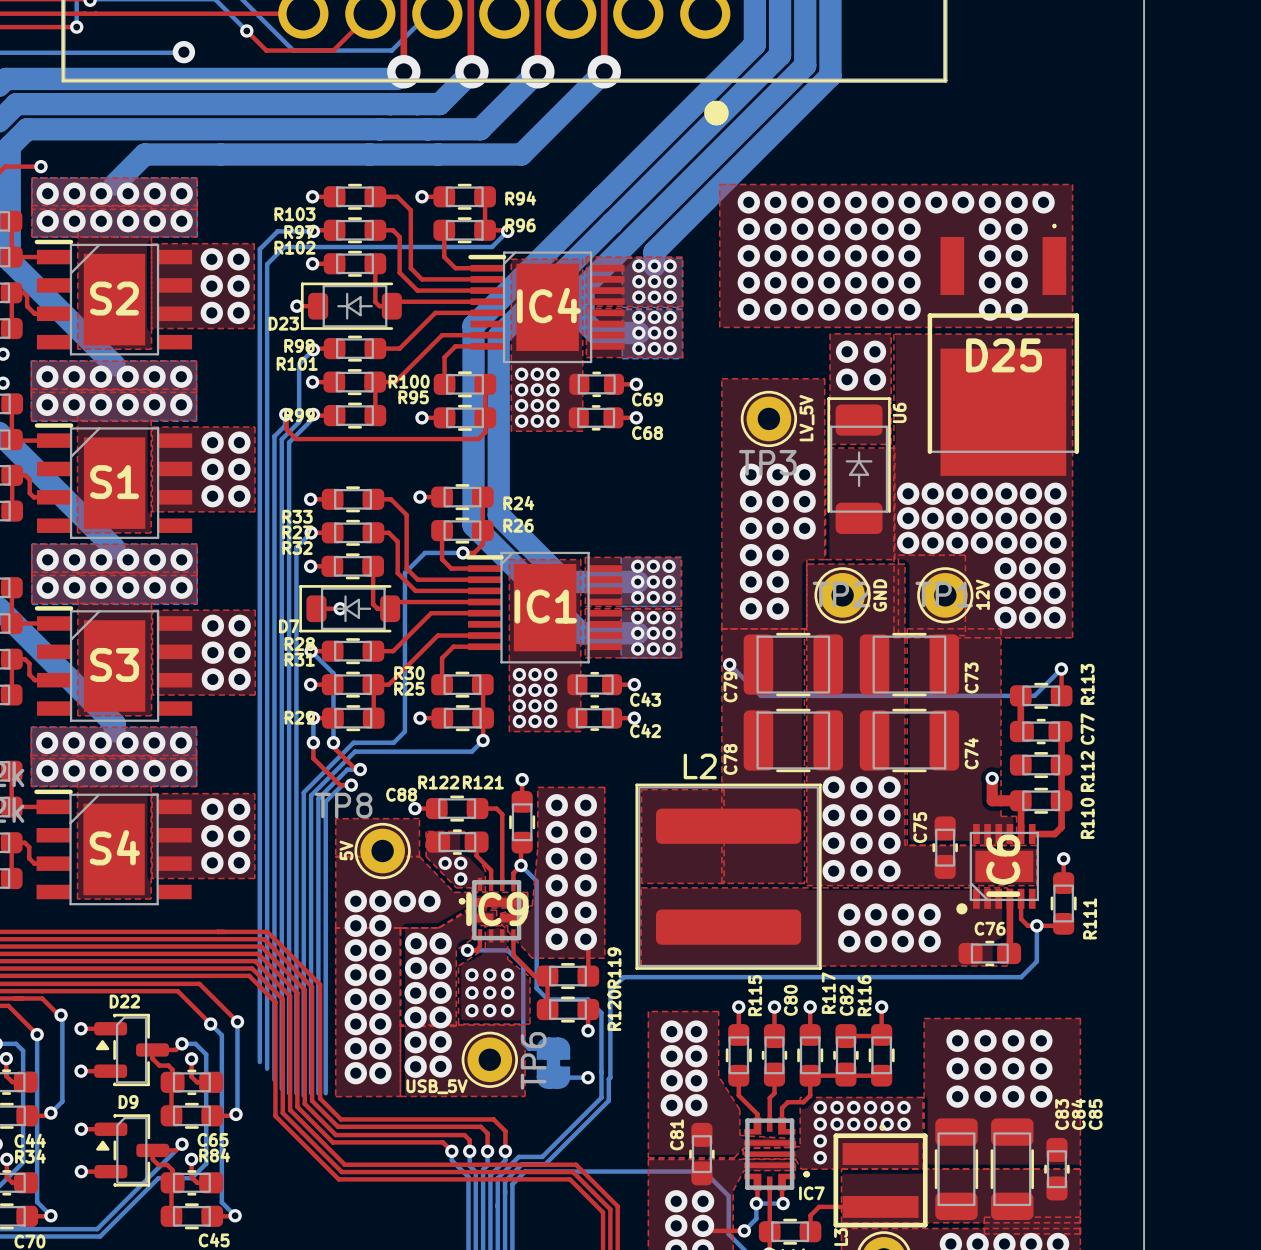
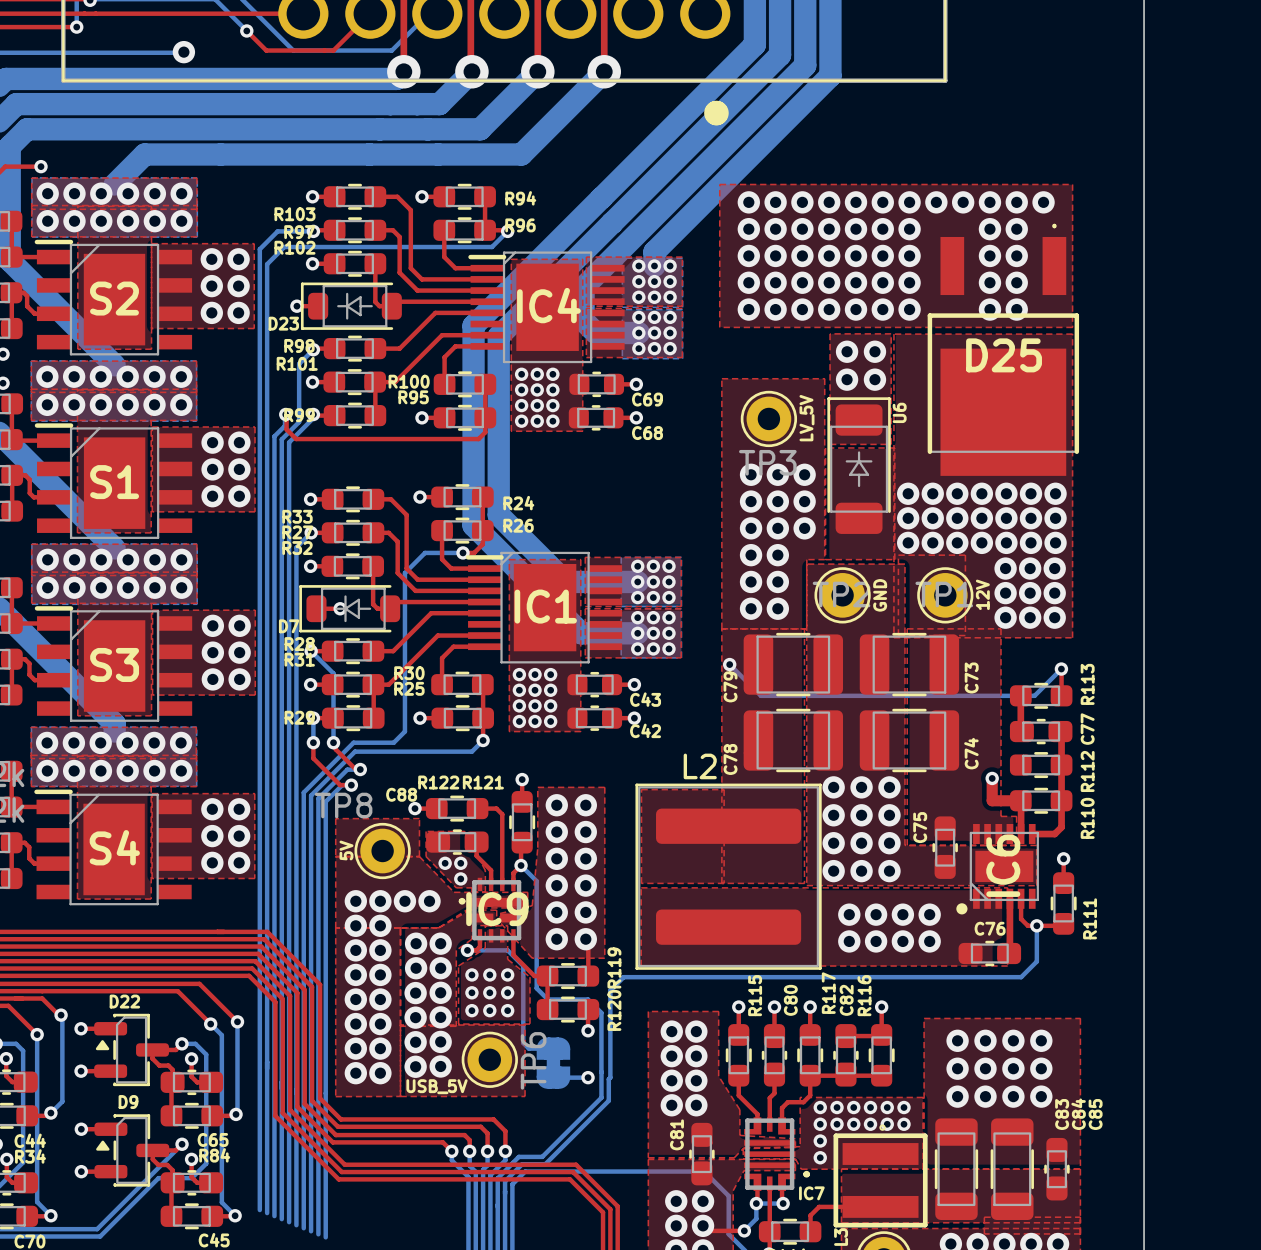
bottom track: none -> (259, 1062) (259, 1210)
bottom track: none -> (267, 1068) (267, 1213)
bottom track: none -> (274, 1079) (274, 1216)
bottom track: none -> (281, 1088) (281, 1219)
bottom track: none -> (289, 1093) (289, 1222)
bottom track: none -> (296, 1093) (296, 1225)
bottom track: none -> (311, 1093) (311, 1231)
bottom track: none -> (318, 1093) (318, 1234)
bottom track: none -> (325, 1093) (325, 1237)
bottom track: none -> (303, 1095) (303, 1228)

